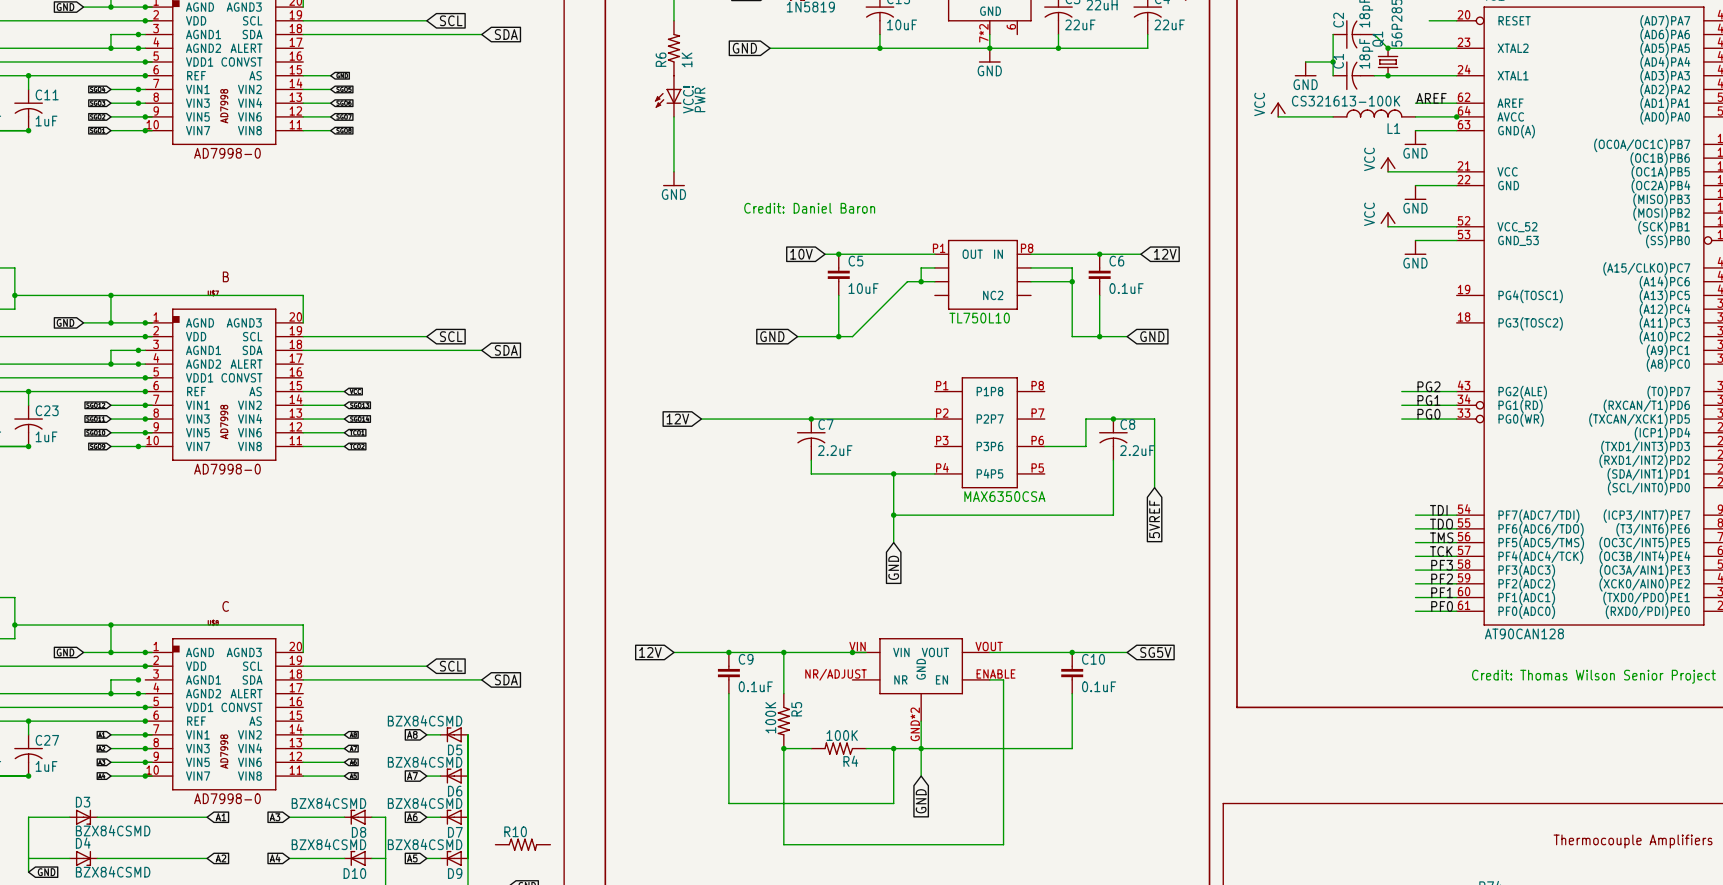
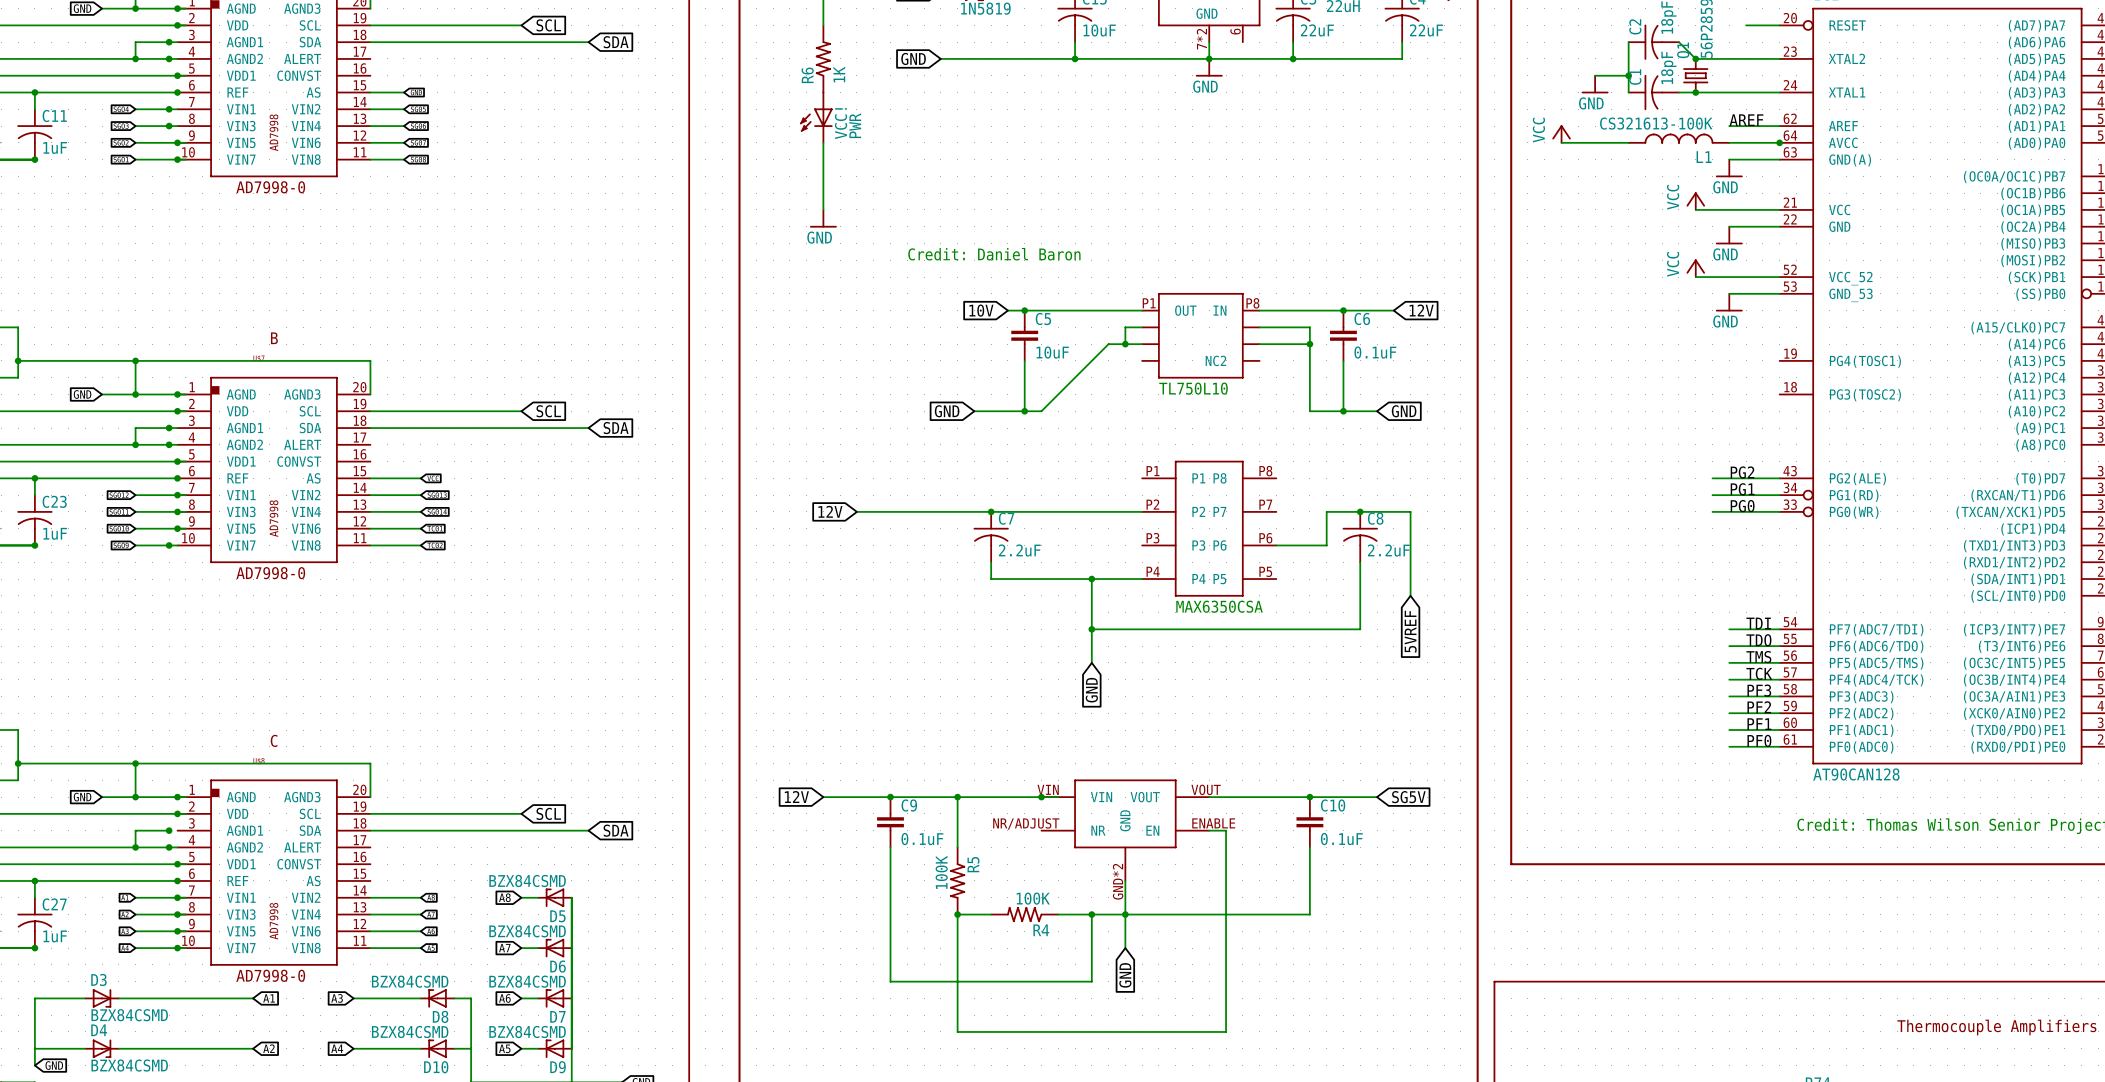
R10: (522, 844) -> none

